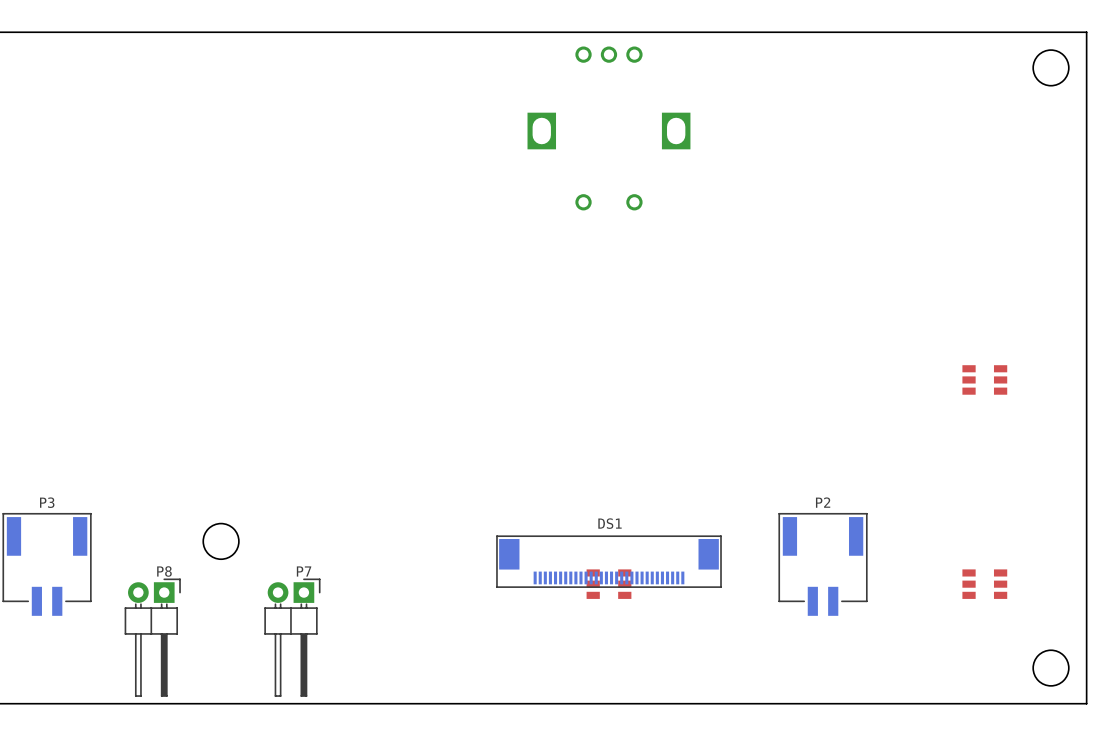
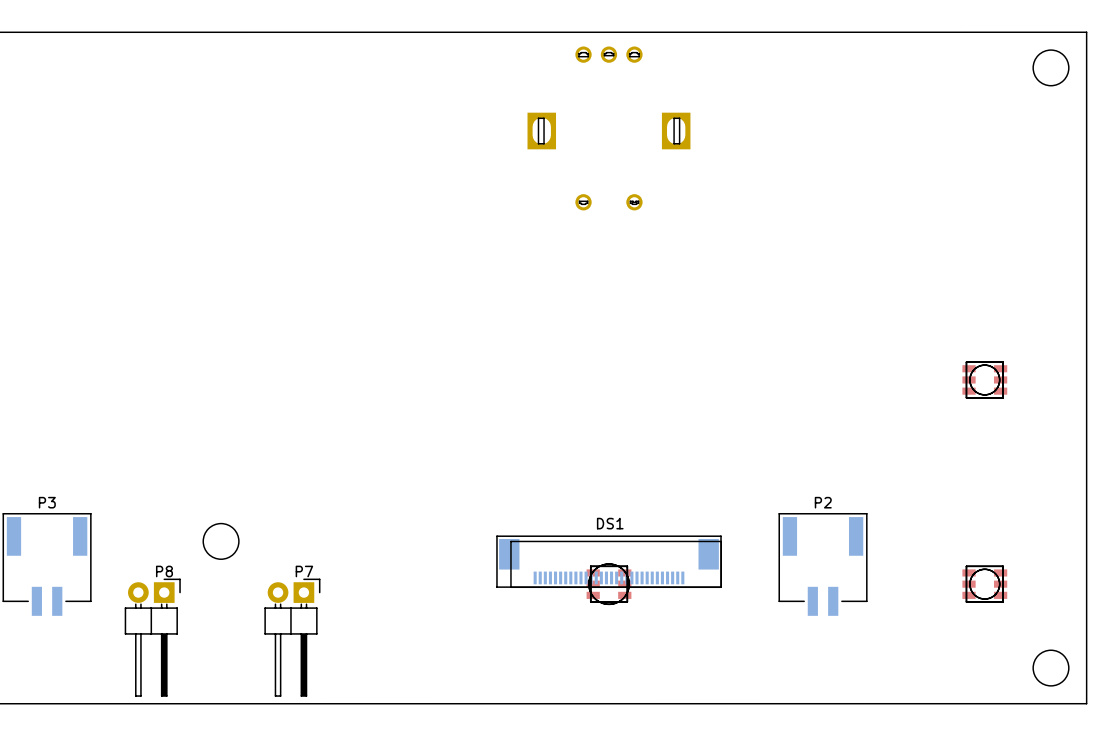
board edge: none -> (585, 52) (579, 53) (579, 56) (588, 56) (588, 53) (585, 52)
board edge: none -> (611, 52) (604, 53) (604, 55) (613, 55) (611, 52)
board edge: none -> (636, 52) (629, 53) (629, 56) (639, 56) (639, 53) (636, 52)
board edge: none -> (544, 118) (538, 118) (538, 143) (544, 143) (544, 118)
board edge: none -> (679, 118) (674, 118) (674, 143) (679, 143) (679, 118)
board edge: none -> (587, 201) (579, 201) (579, 203) (585, 204) (587, 201)
board edge: none -> (638, 201) (636, 204) (630, 203) (630, 201) (638, 201)
board edge: none -> (1003, 362) (1003, 397) (966, 397) (966, 362) (1003, 362)
round board edge: none -> [969, 364, 1001, 396]
board edge: none -> (721, 541) (510, 541) (510, 587) (721, 587) (721, 541)
round board edge: none -> [588, 563, 630, 605]
board edge: none -> (627, 566) (590, 566) (590, 601) (627, 601) (627, 566)
board edge: none -> (1003, 566) (966, 566) (966, 601) (1003, 601) (1003, 566)
round board edge: none -> [969, 568, 1001, 600]

